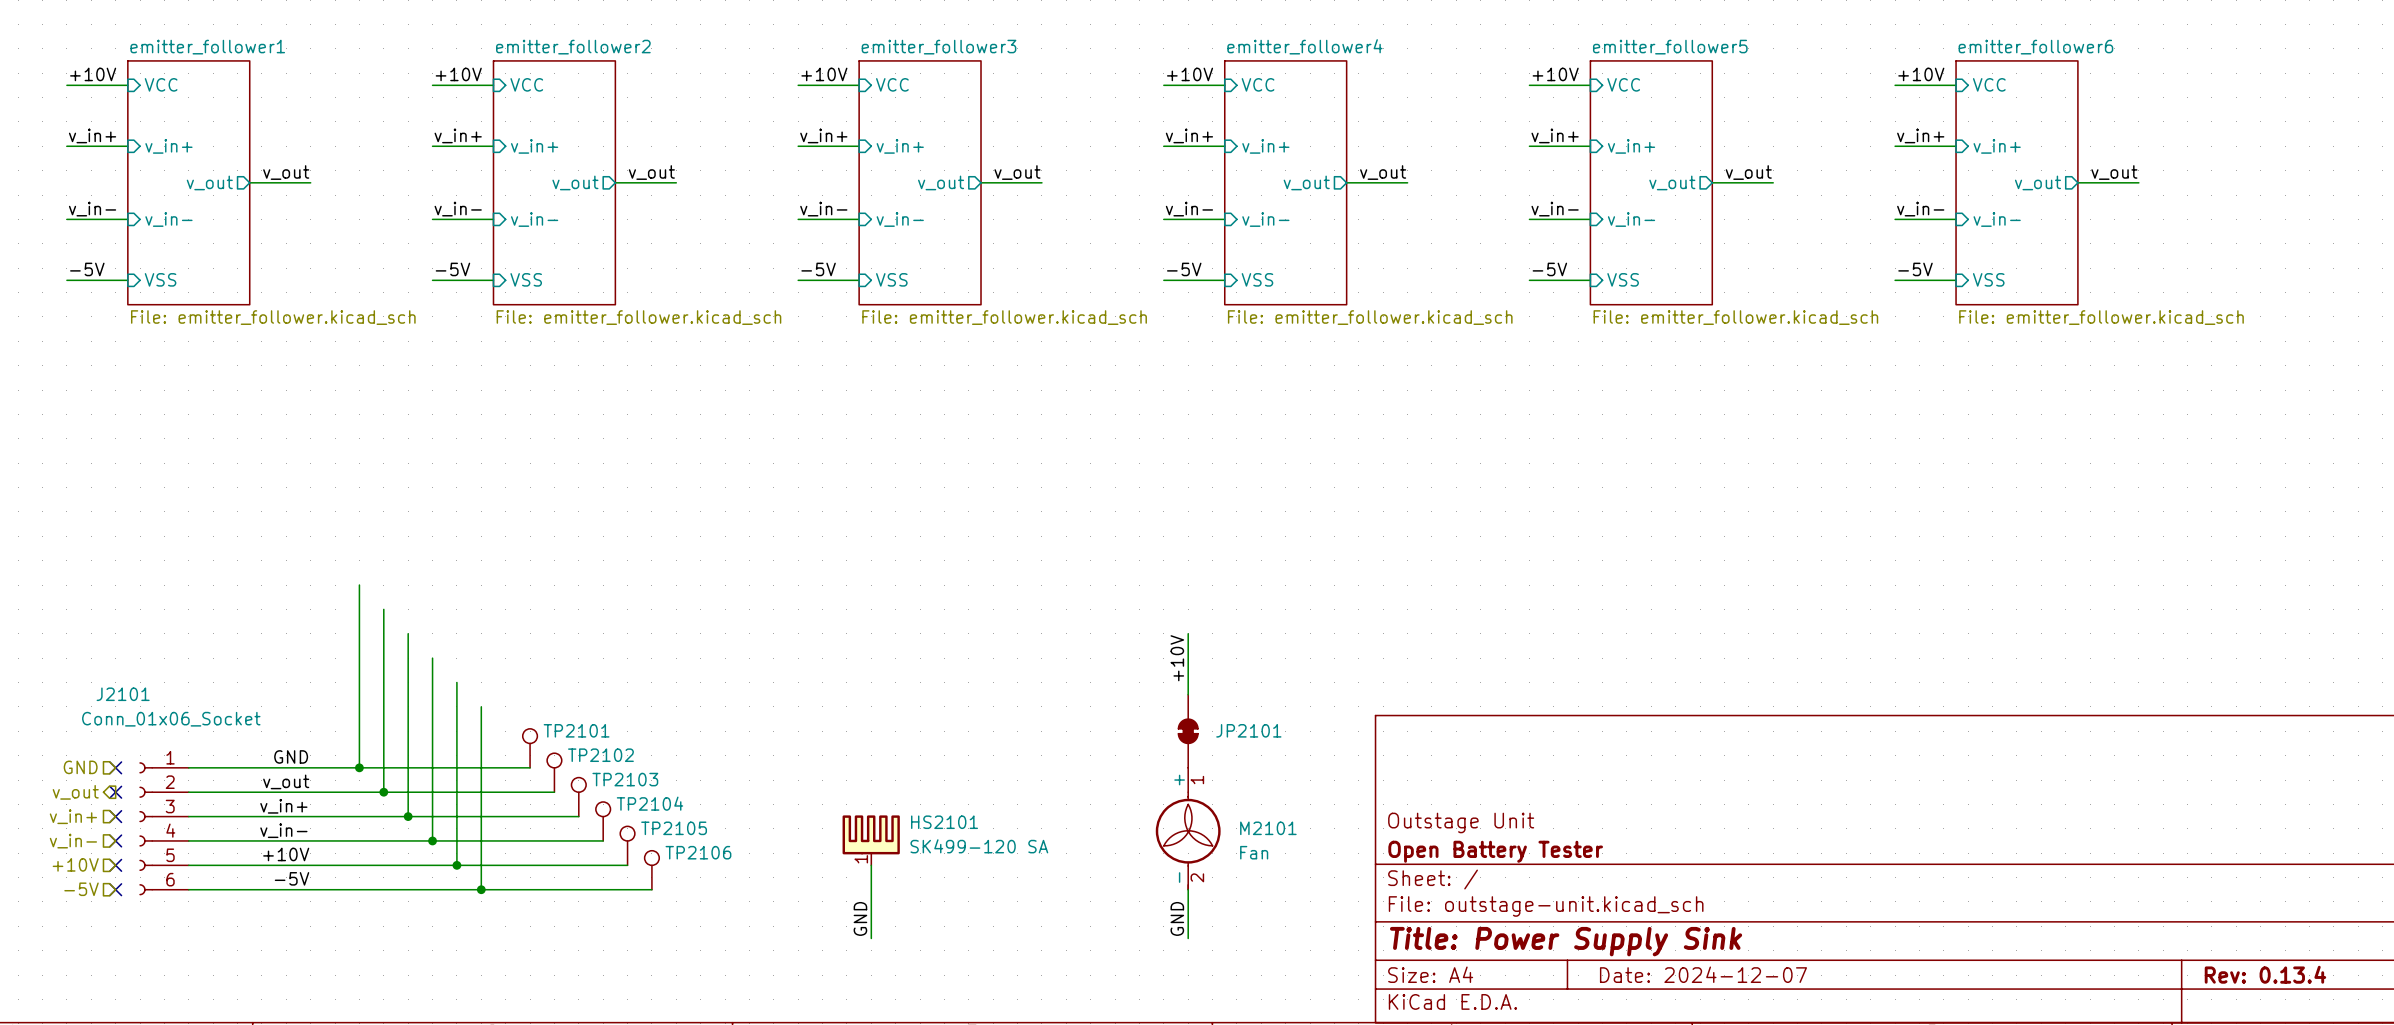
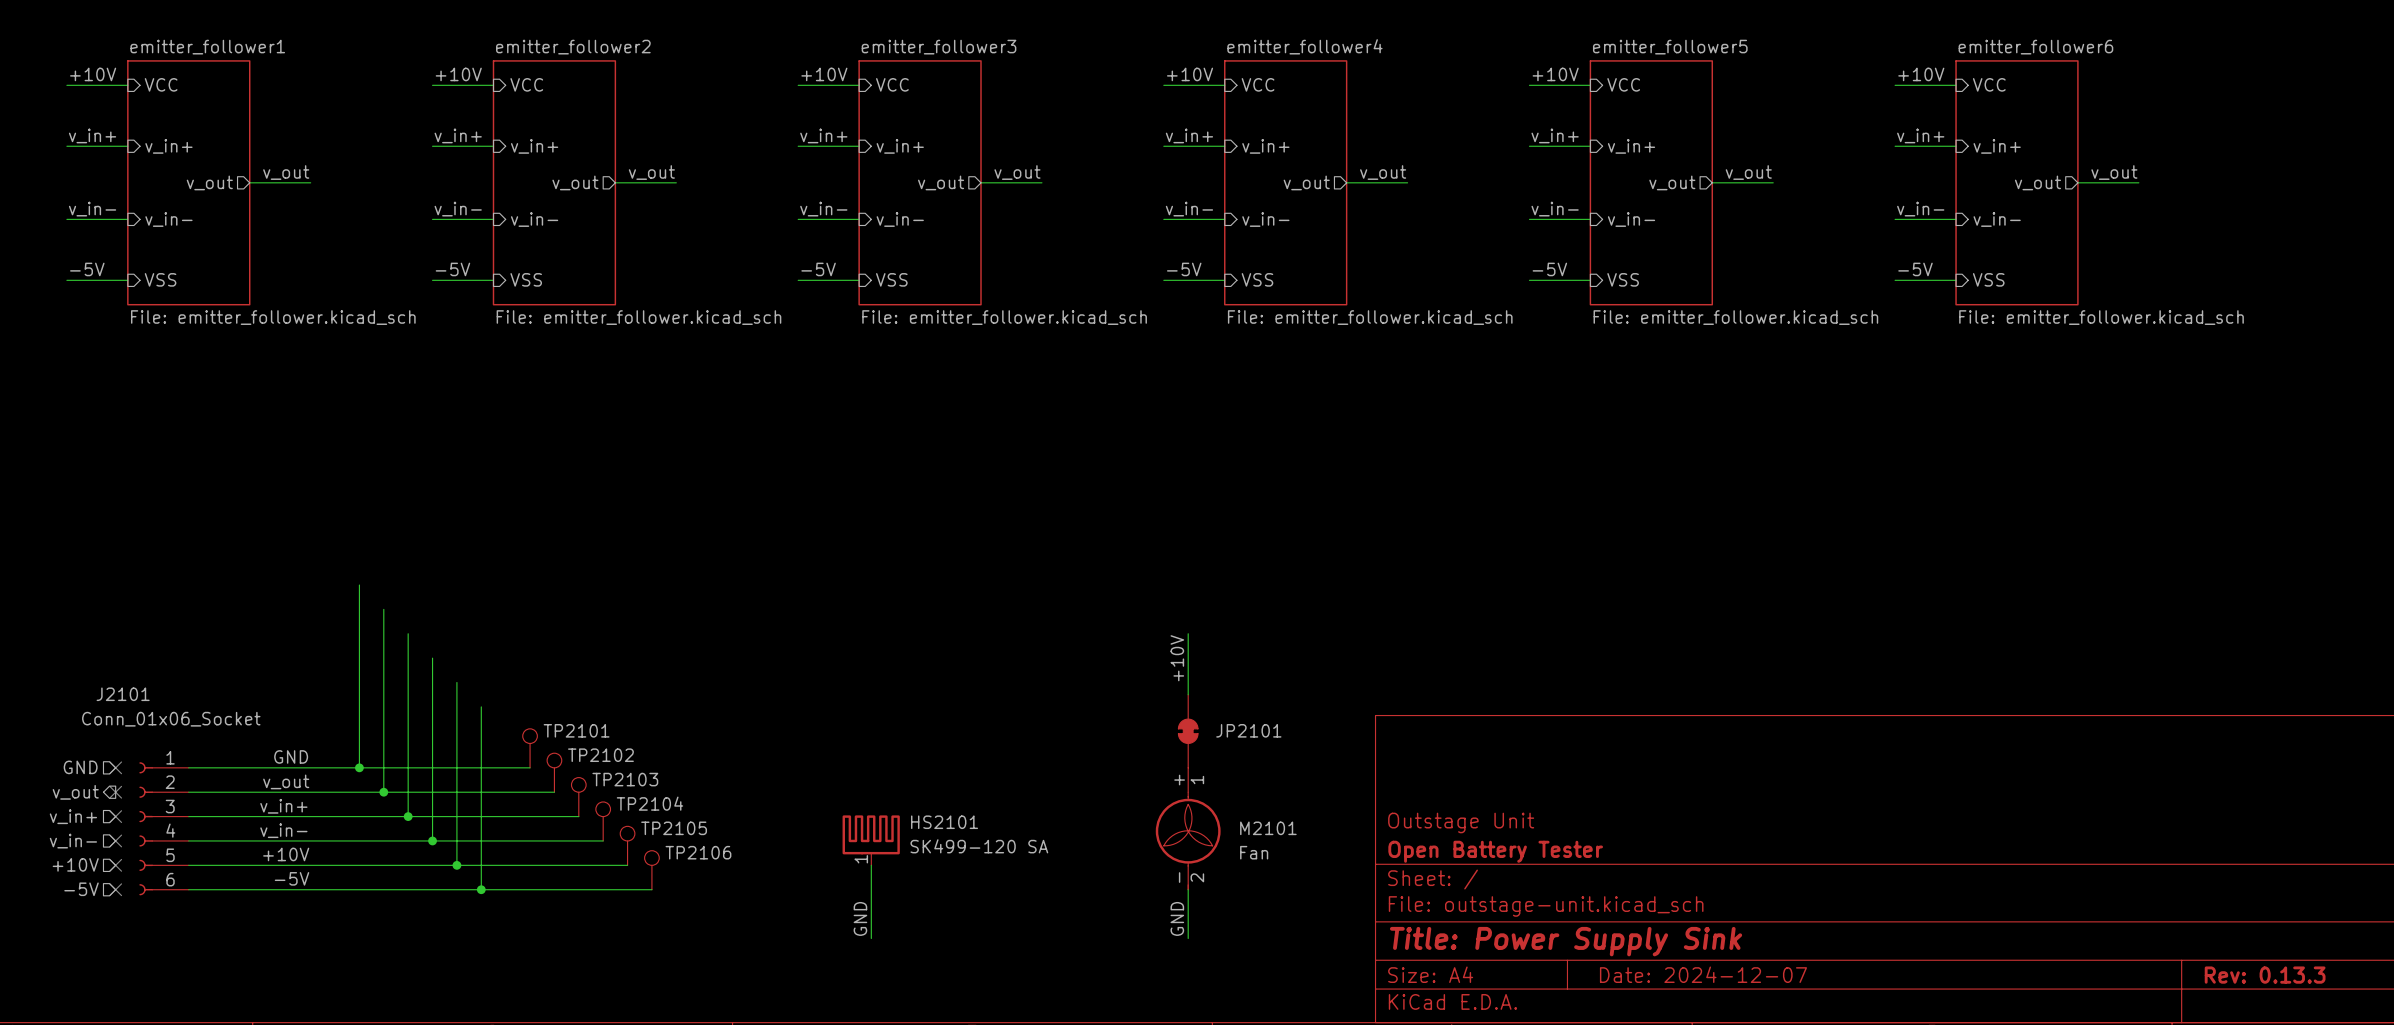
title block: Rev: 0.13.4 (2265, 974) -> Rev: 0.13.3 (2265, 975)

